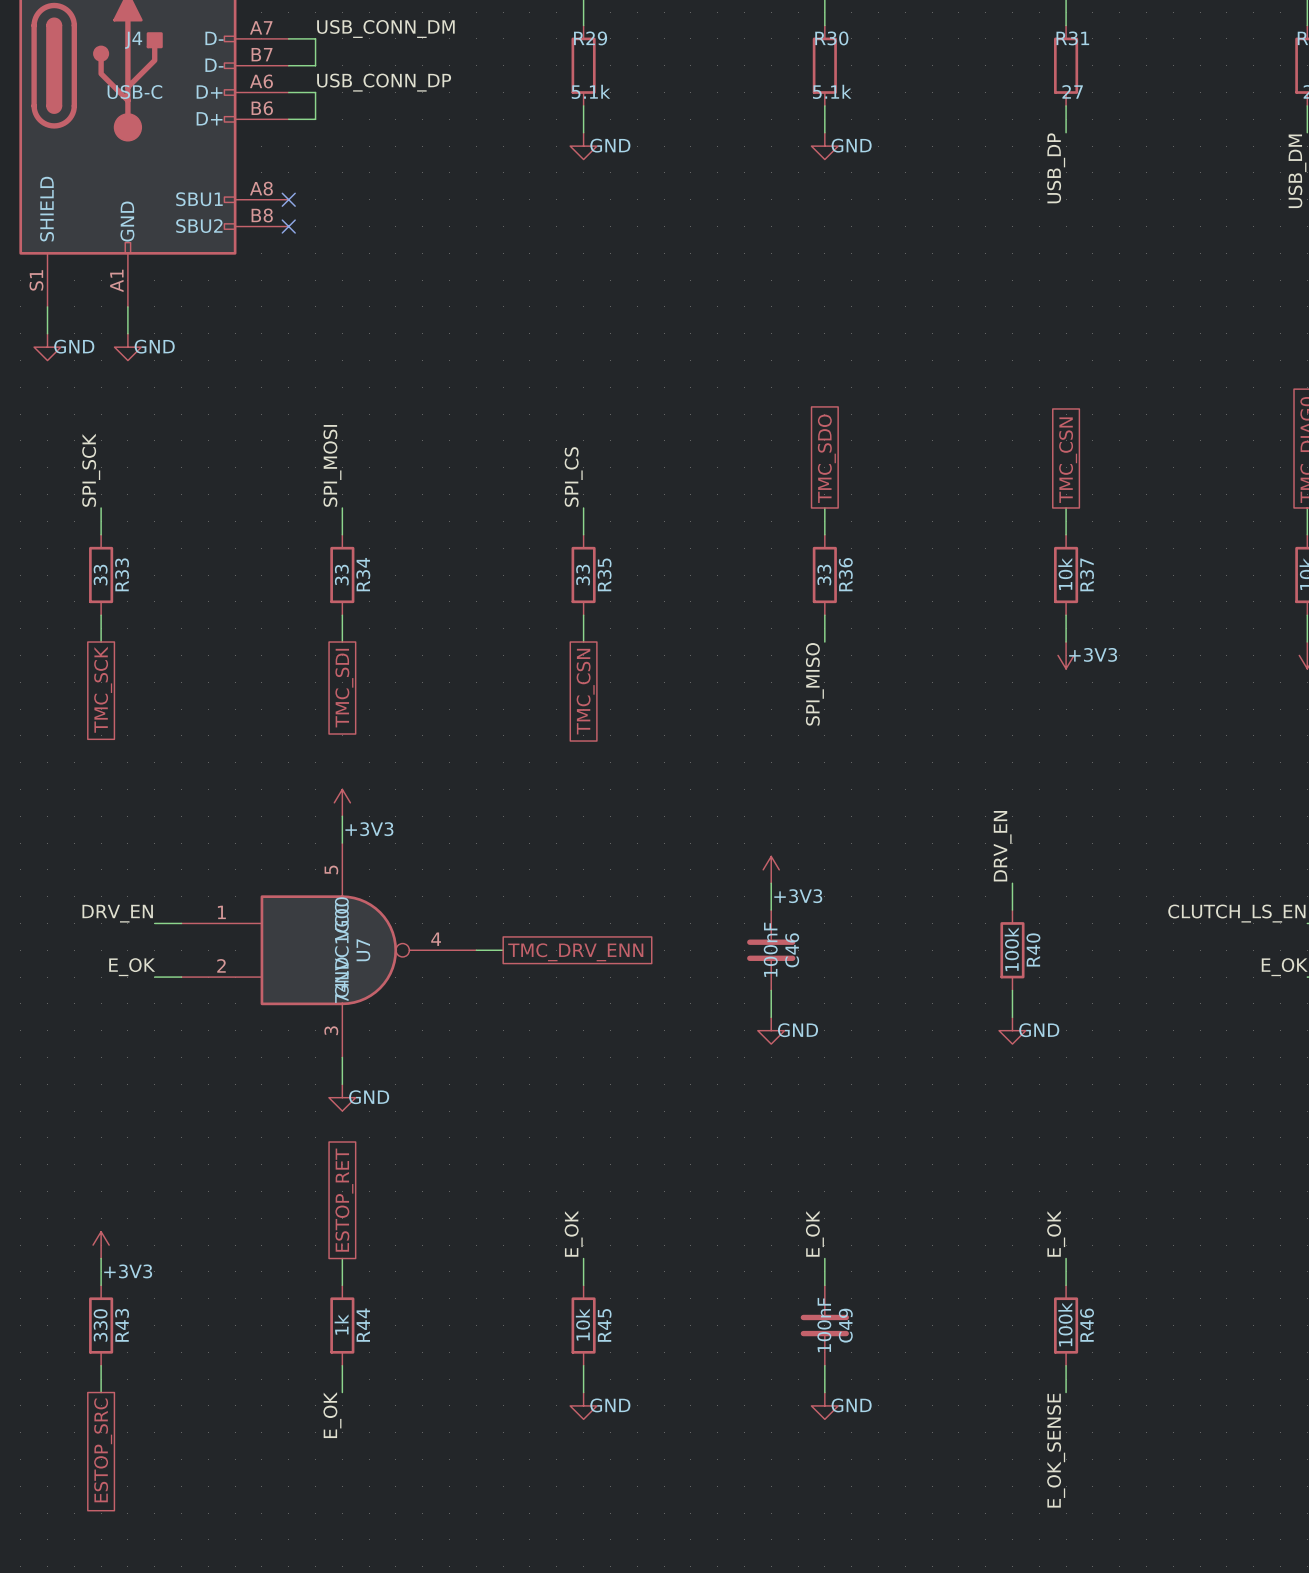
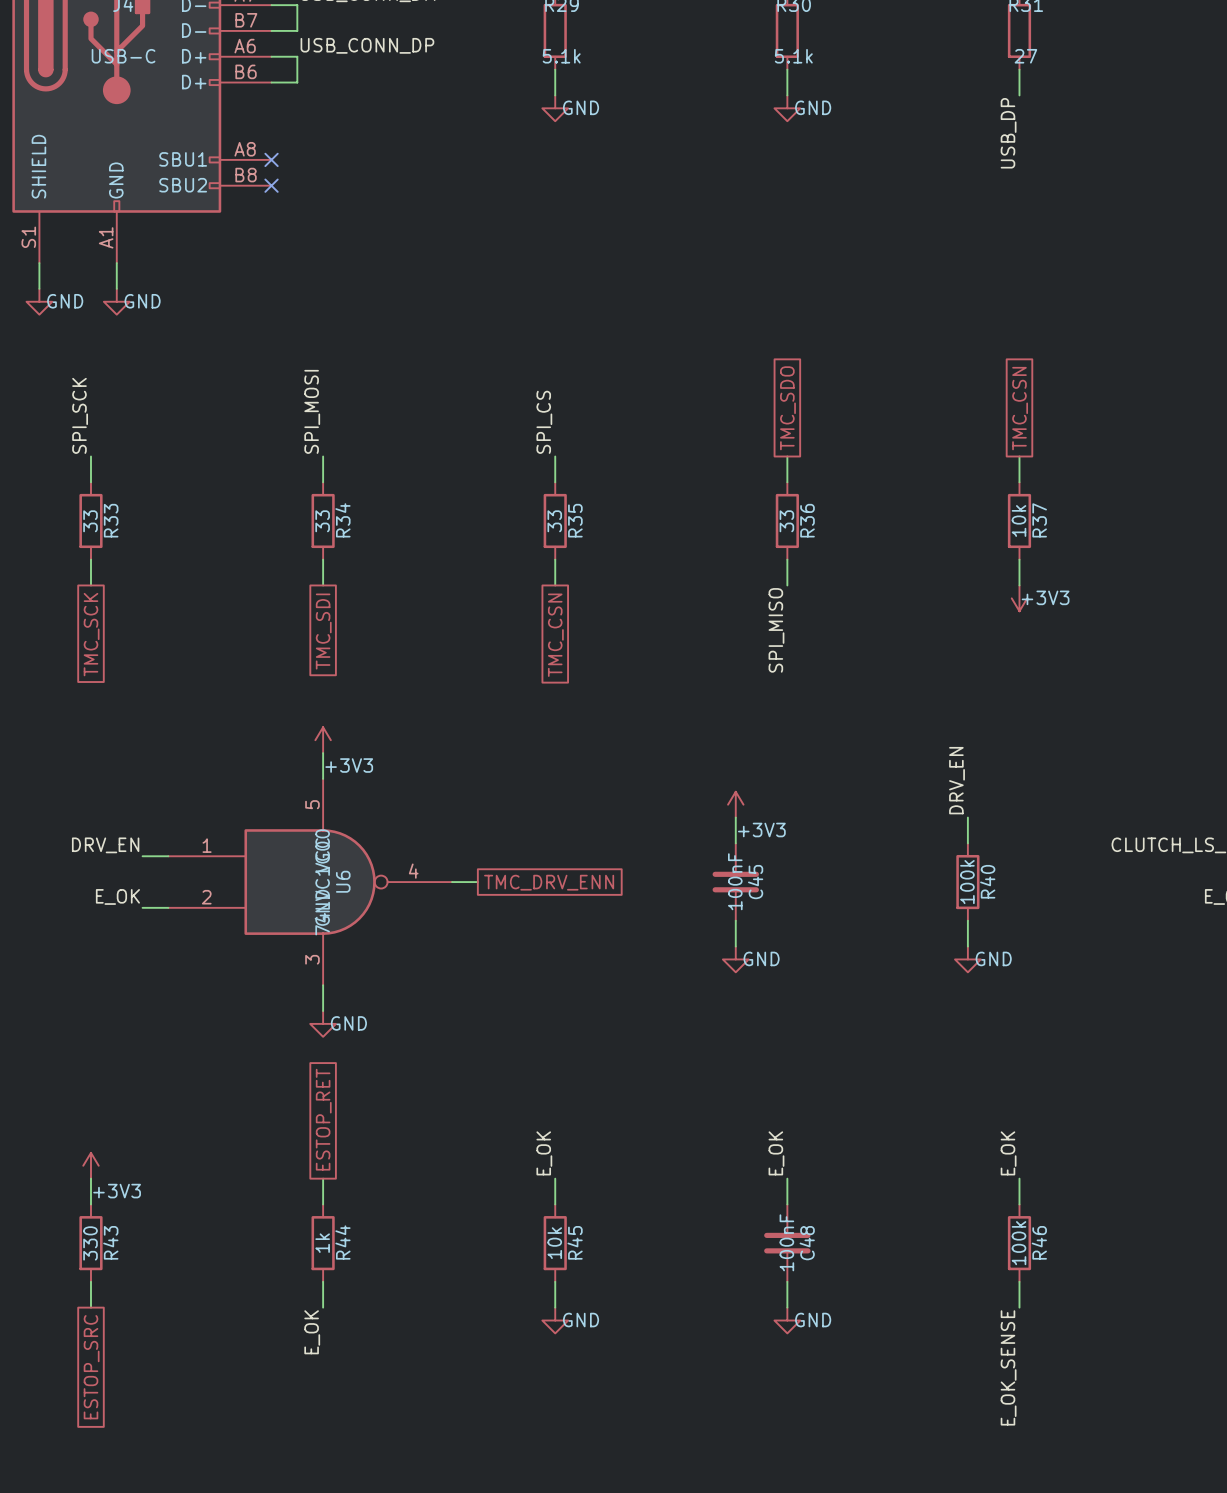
U7 name: U7 (363, 950) -> U6 (343, 881)
C46 name: C46 (792, 950) -> C45 (755, 882)
C49 name: C49 (845, 1325) -> C48 (807, 1243)

